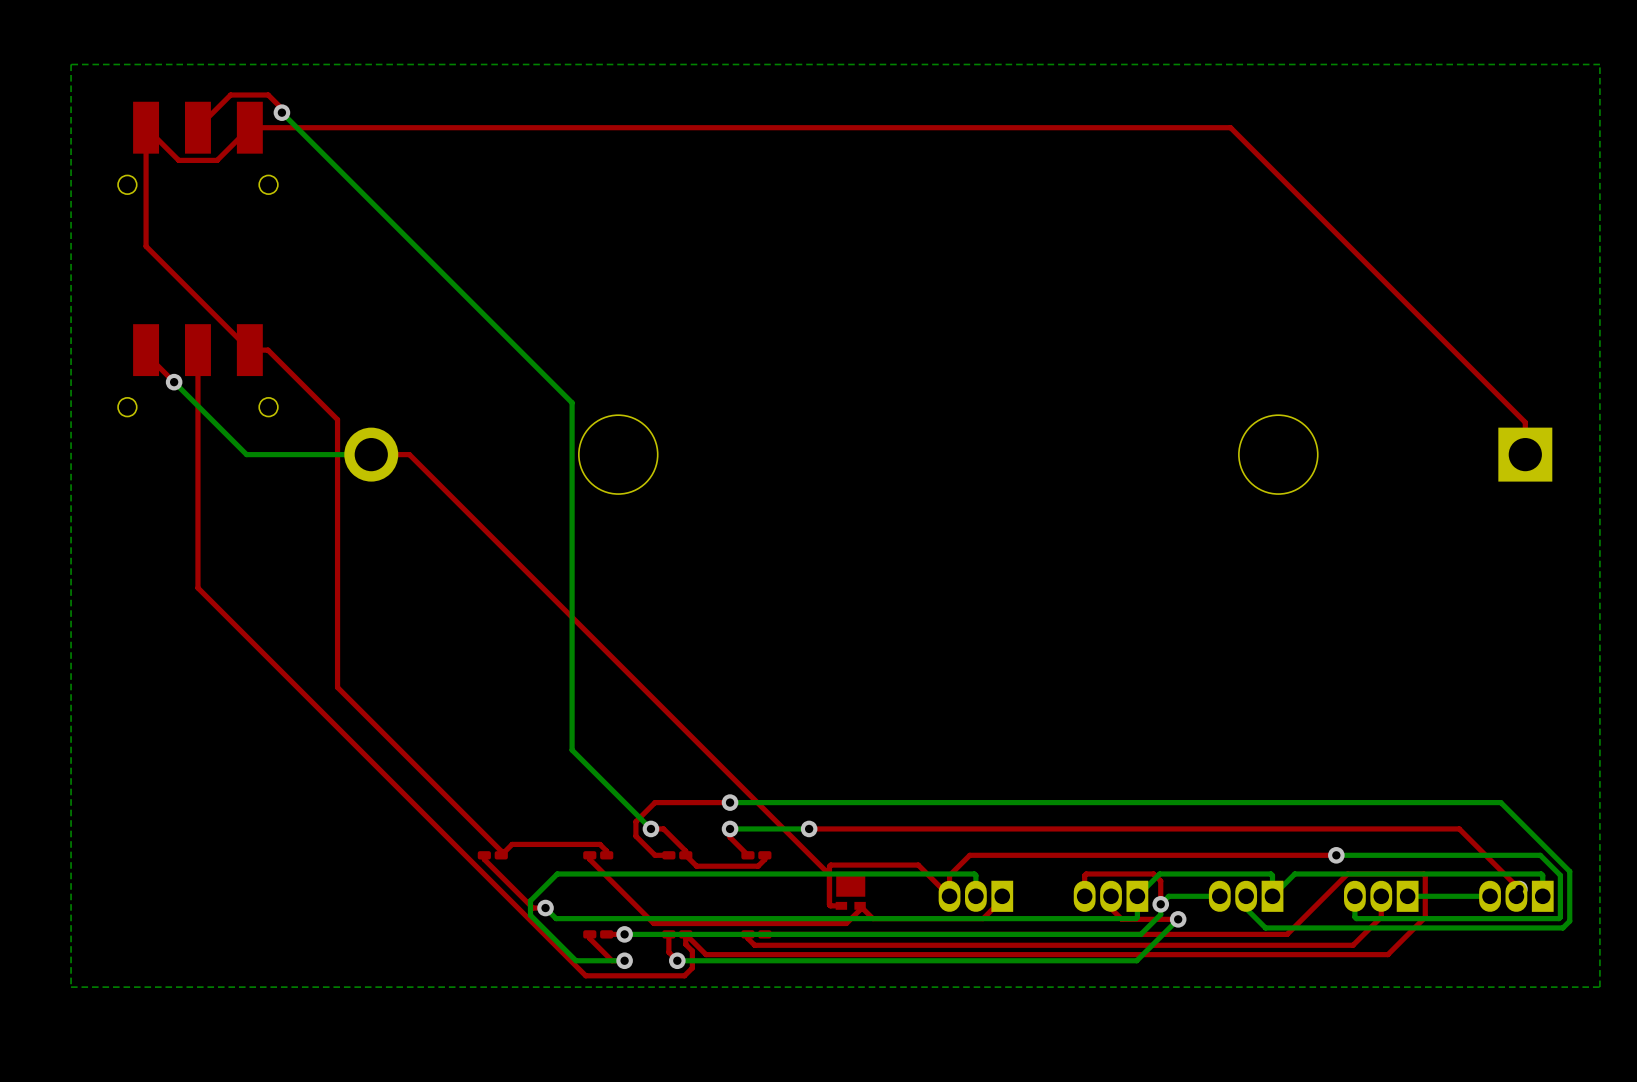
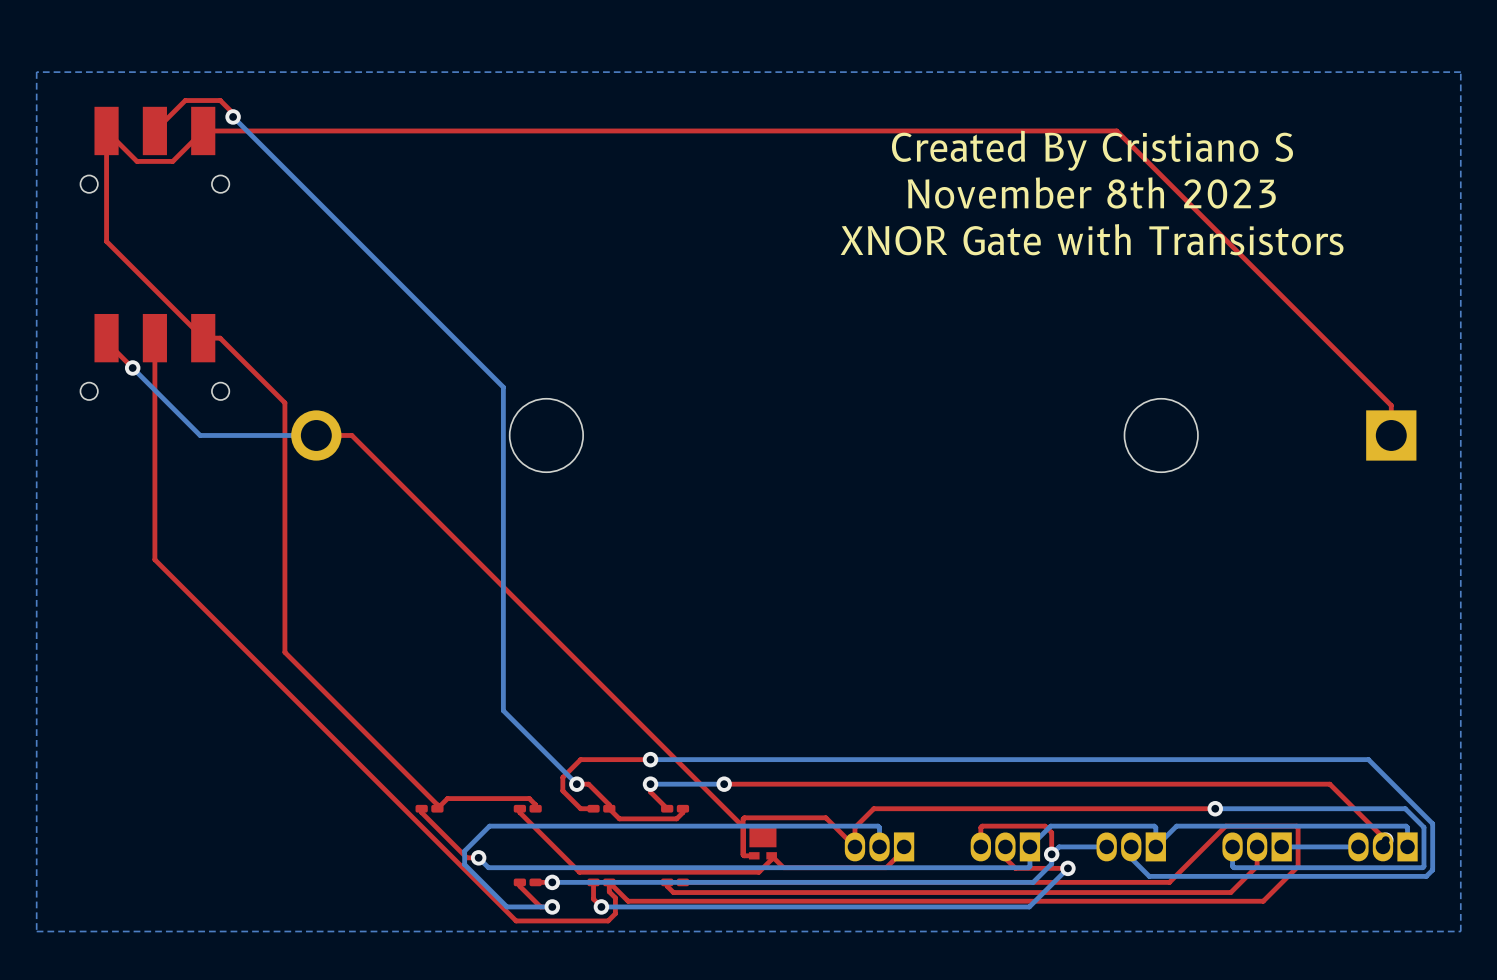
text: none -> Created By Cristiano S (1092, 150)
text: none -> November 8th 2023 (1091, 193)
text: none -> XNOR Gate with Transistors (1092, 239)

